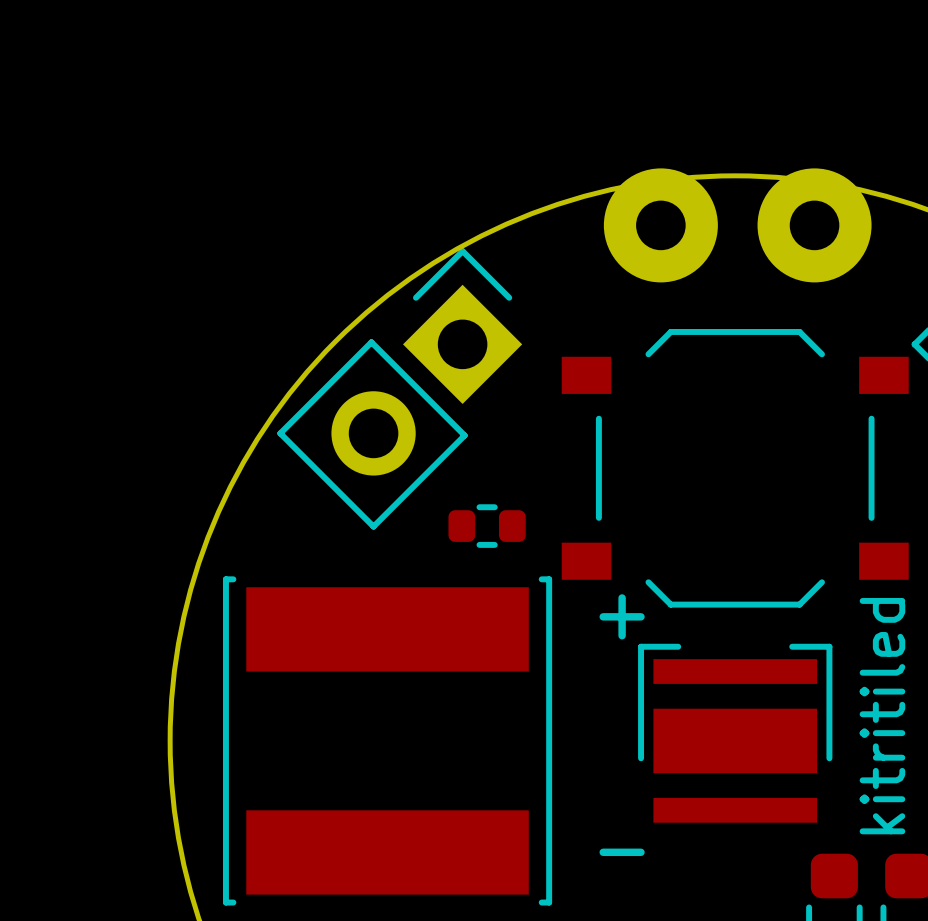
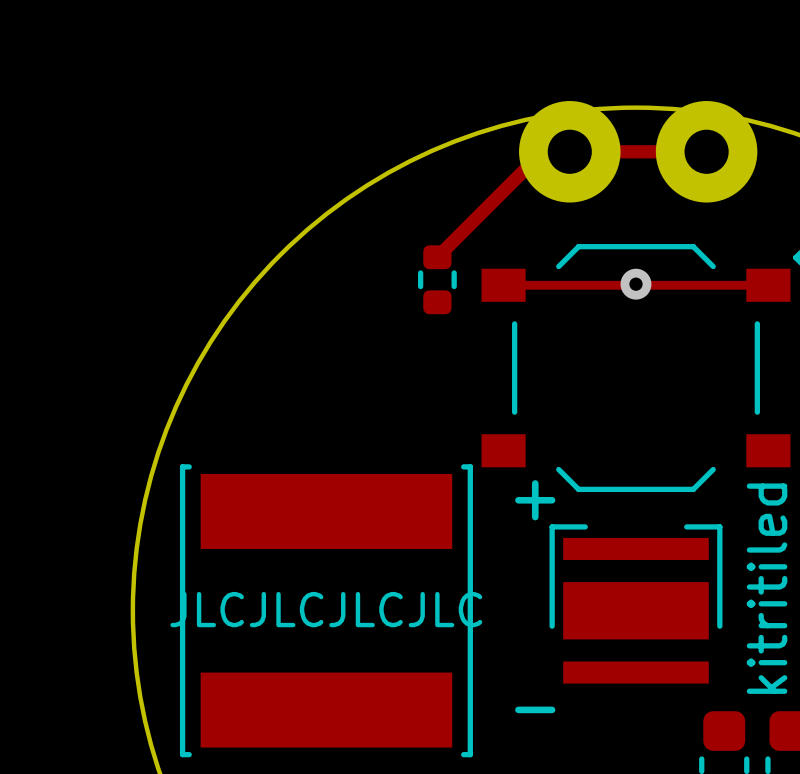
track: none -> (706, 151) (542, 151) (437, 257)
via: none -> (635, 284)
track: none -> (503, 285) (768, 285)
part: (399, 388) -> none
part rotation: 0° (487, 526) -> 90° clockwise (437, 279)
part position: (487, 526) -> (437, 279)
text: none -> JLCJLCJLCJLC (326, 609)

